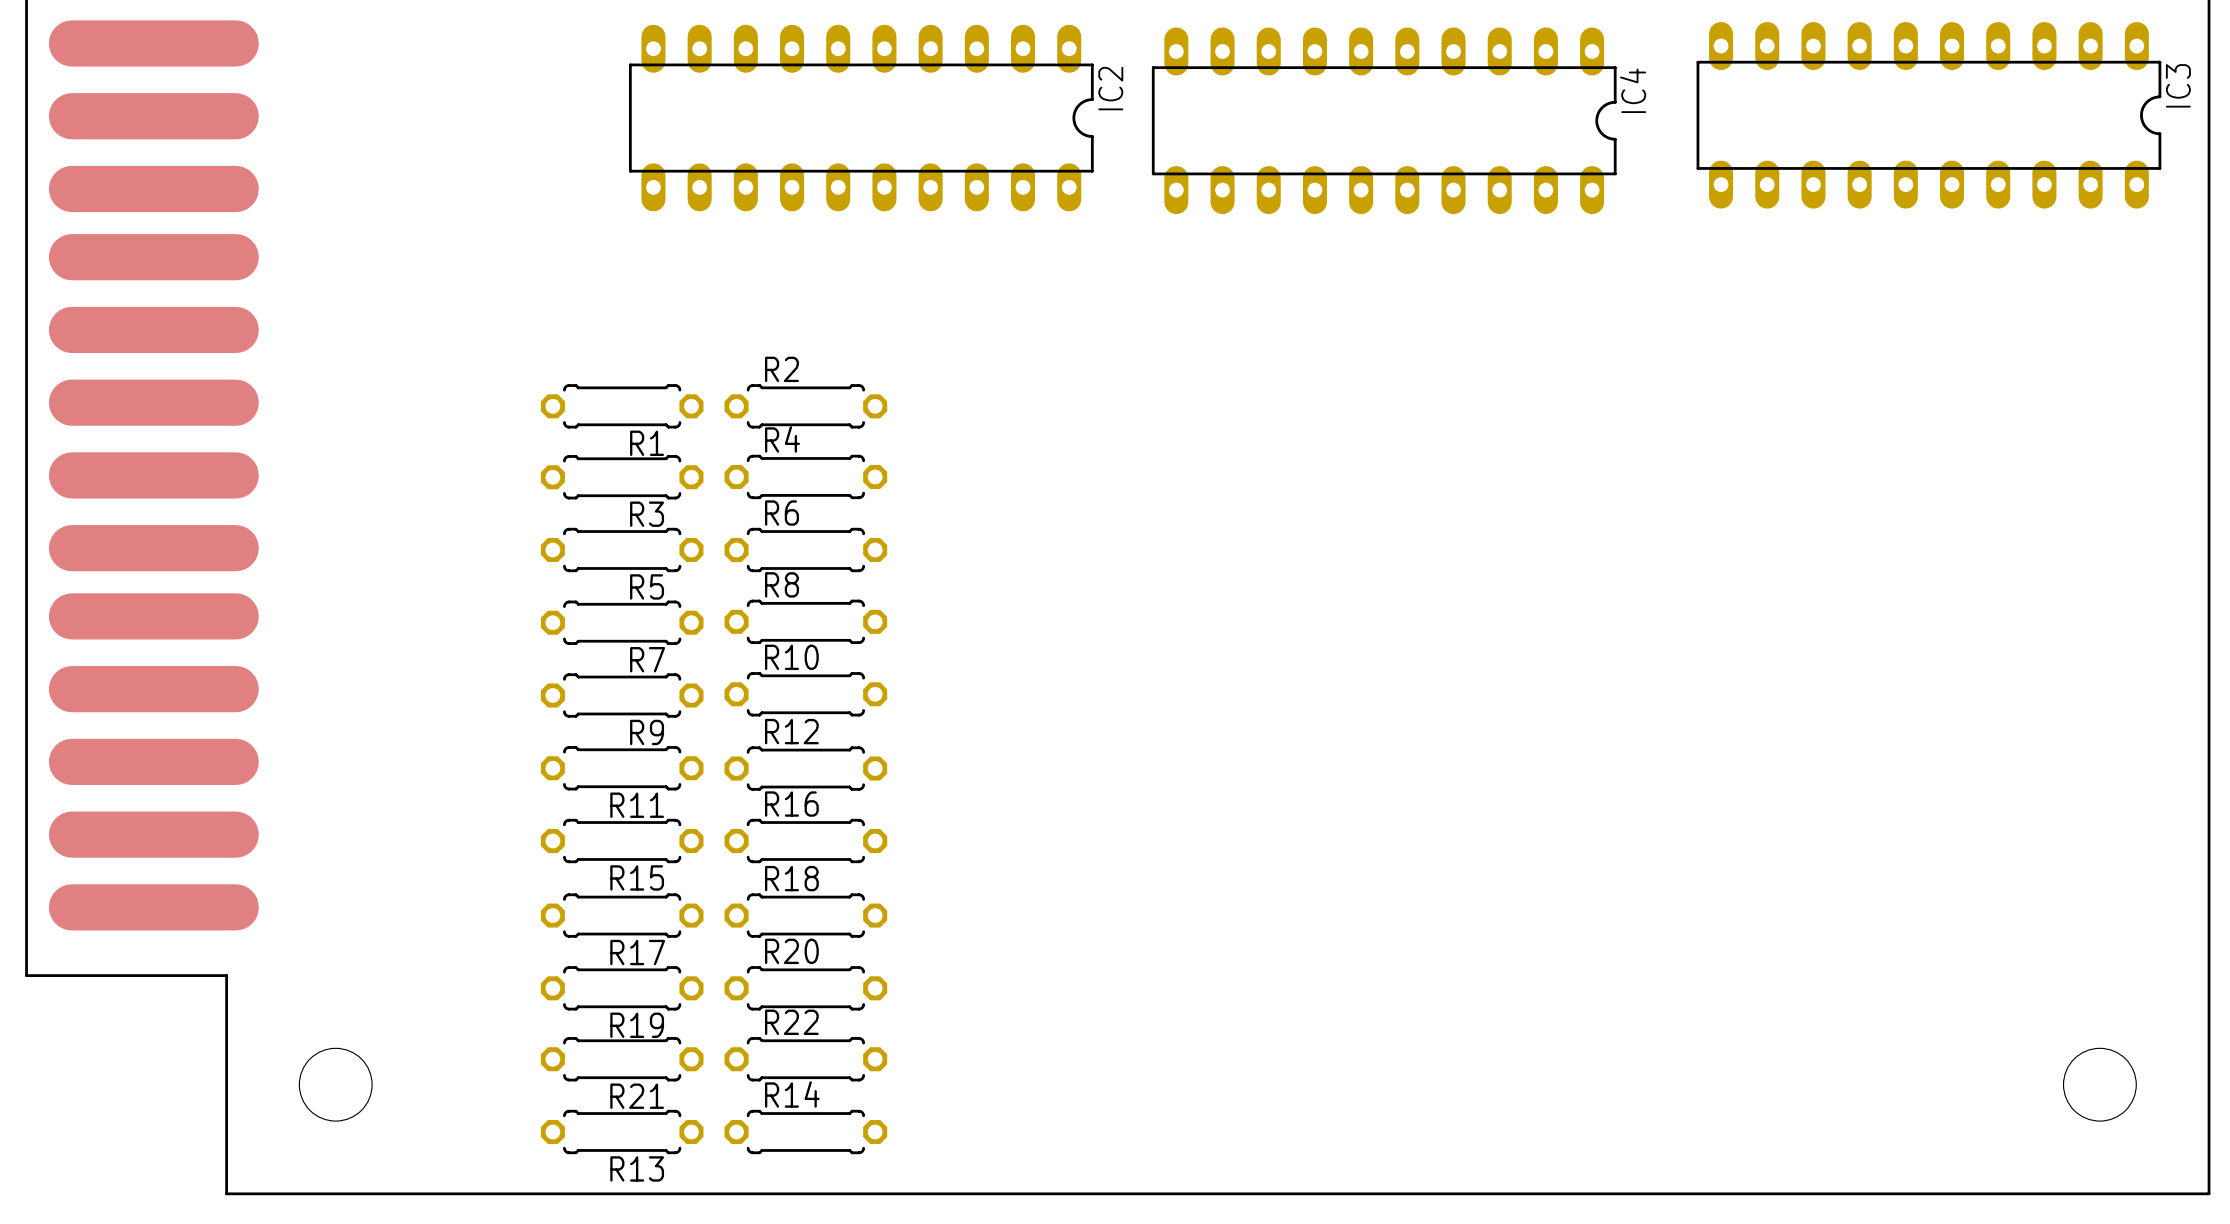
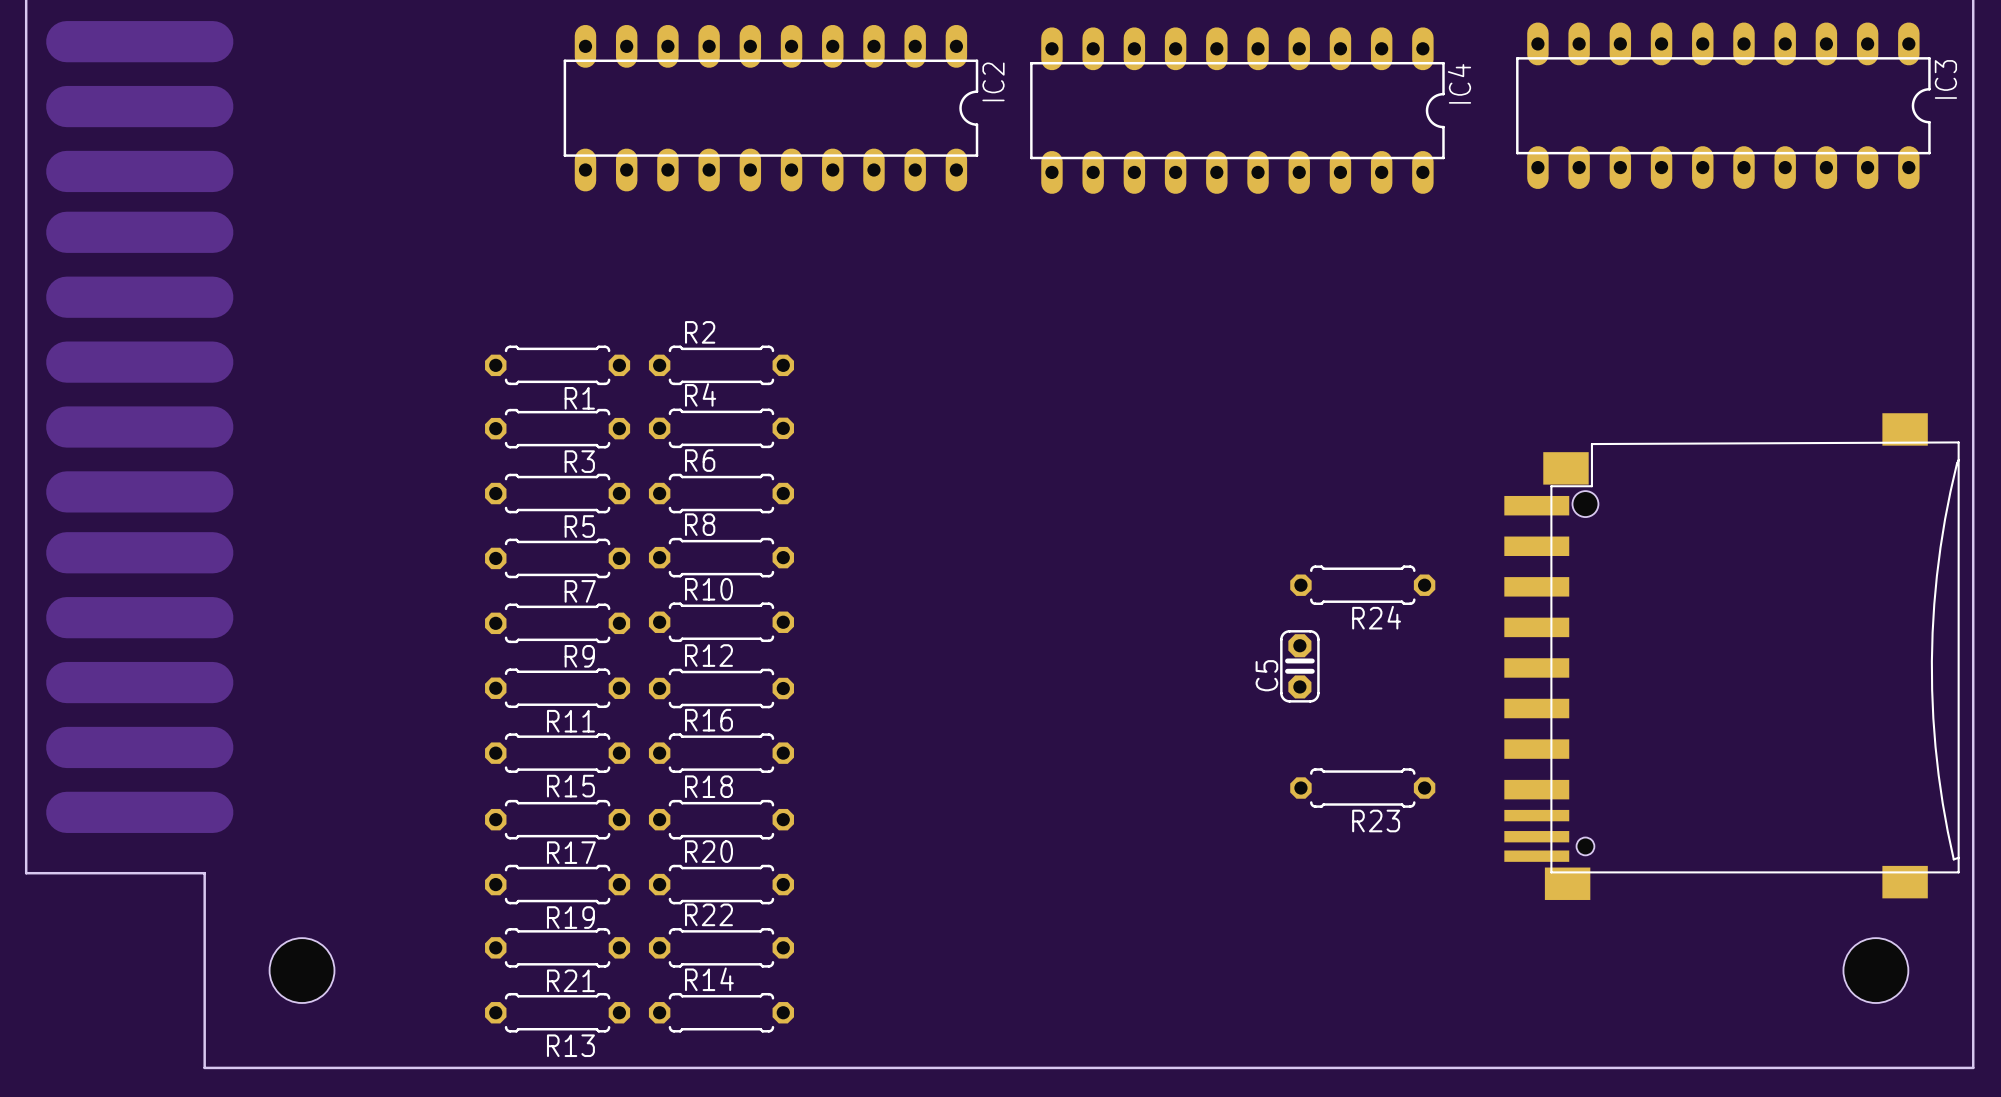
R24: none -> (1362, 585)
part: none -> (1732, 656)
C5: none -> (1299, 666)
R23: none -> (1362, 788)

